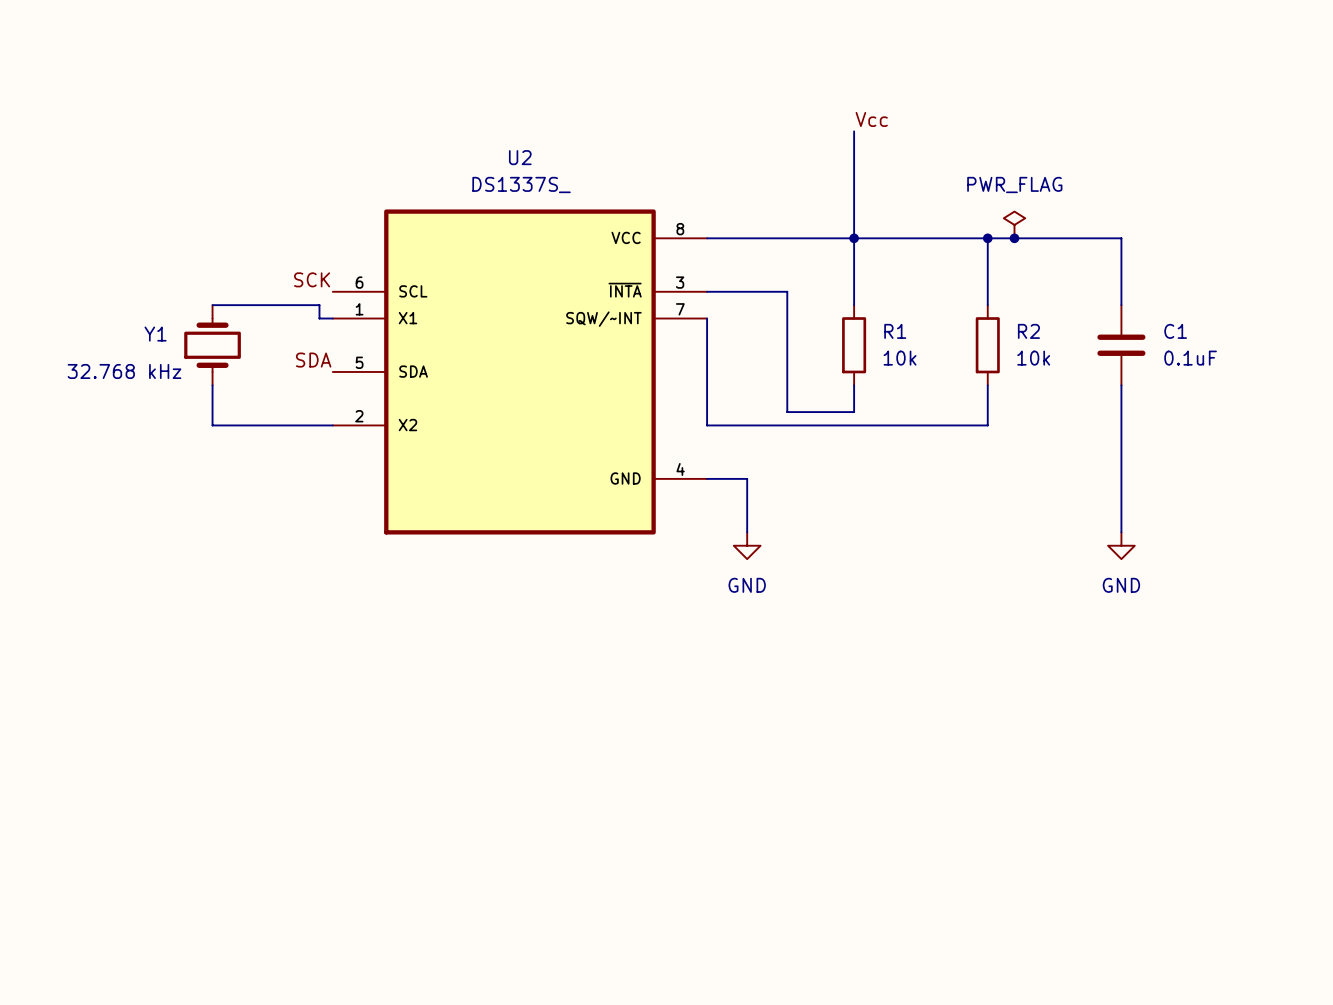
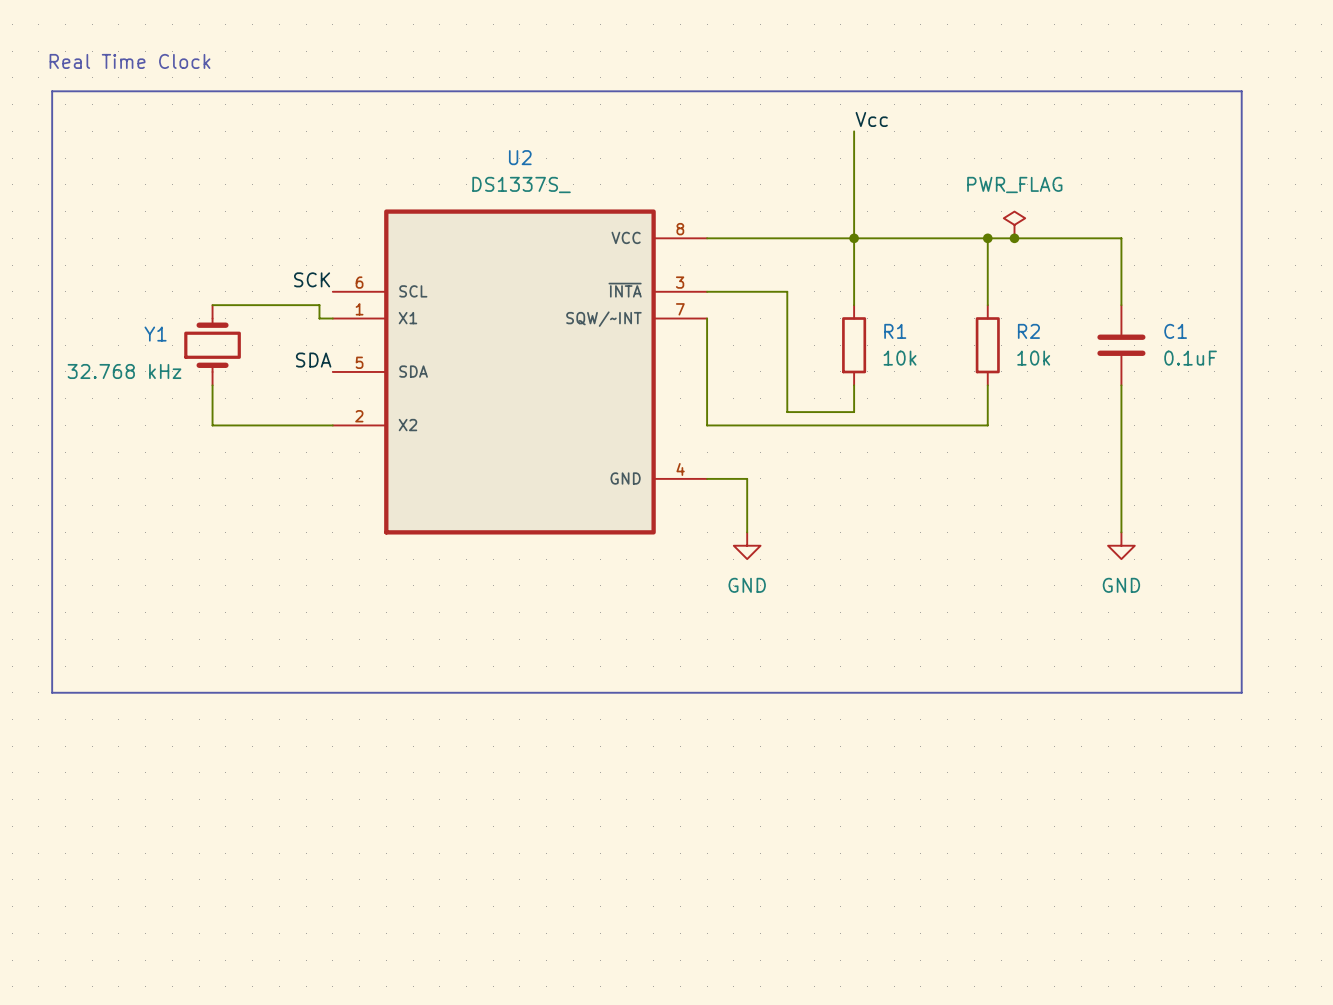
text: none -> Real Time Clock (130, 61)
line: none -> (52, 91) (1241, 91) (1241, 692) (52, 692) (52, 91)

